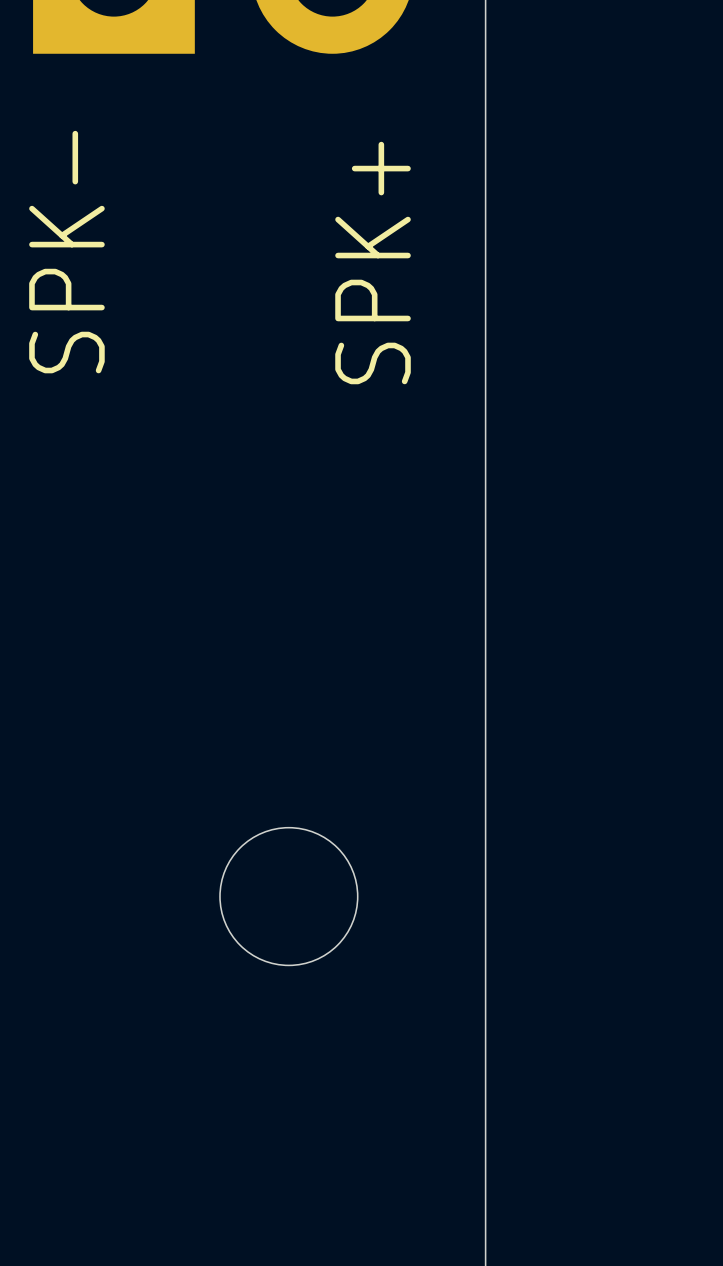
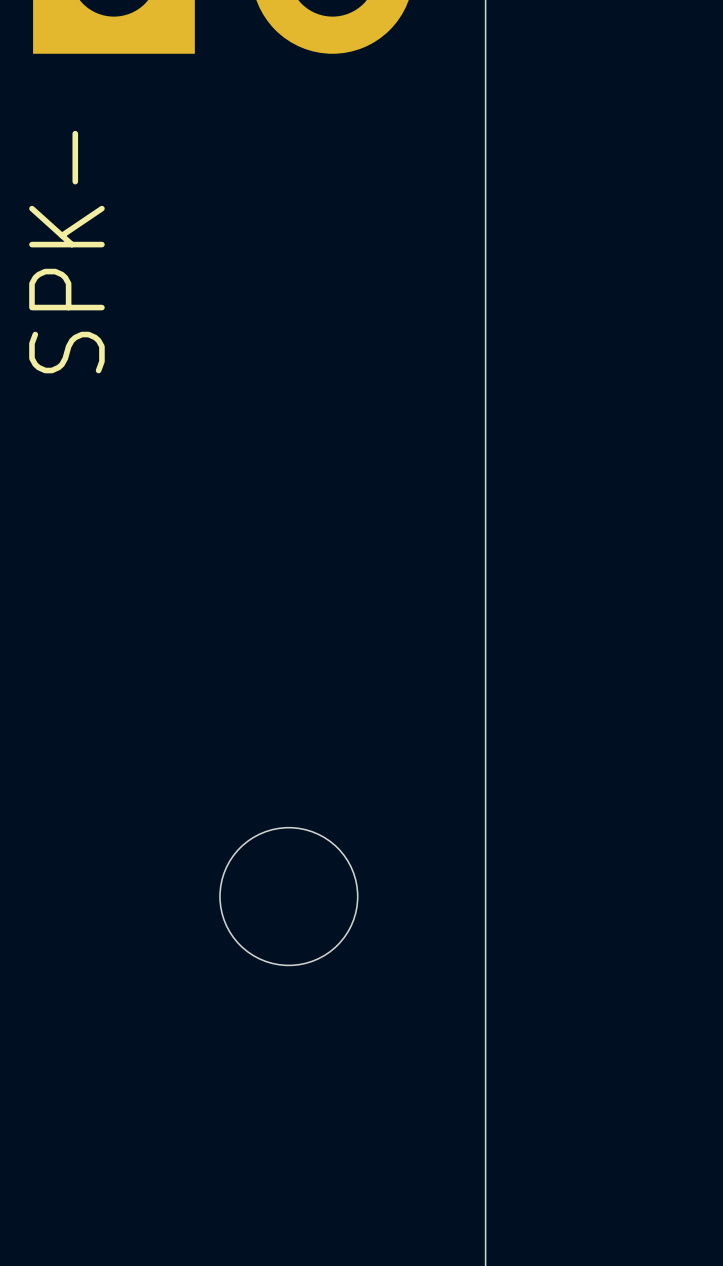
text: SPK+ (373, 263) -> none

